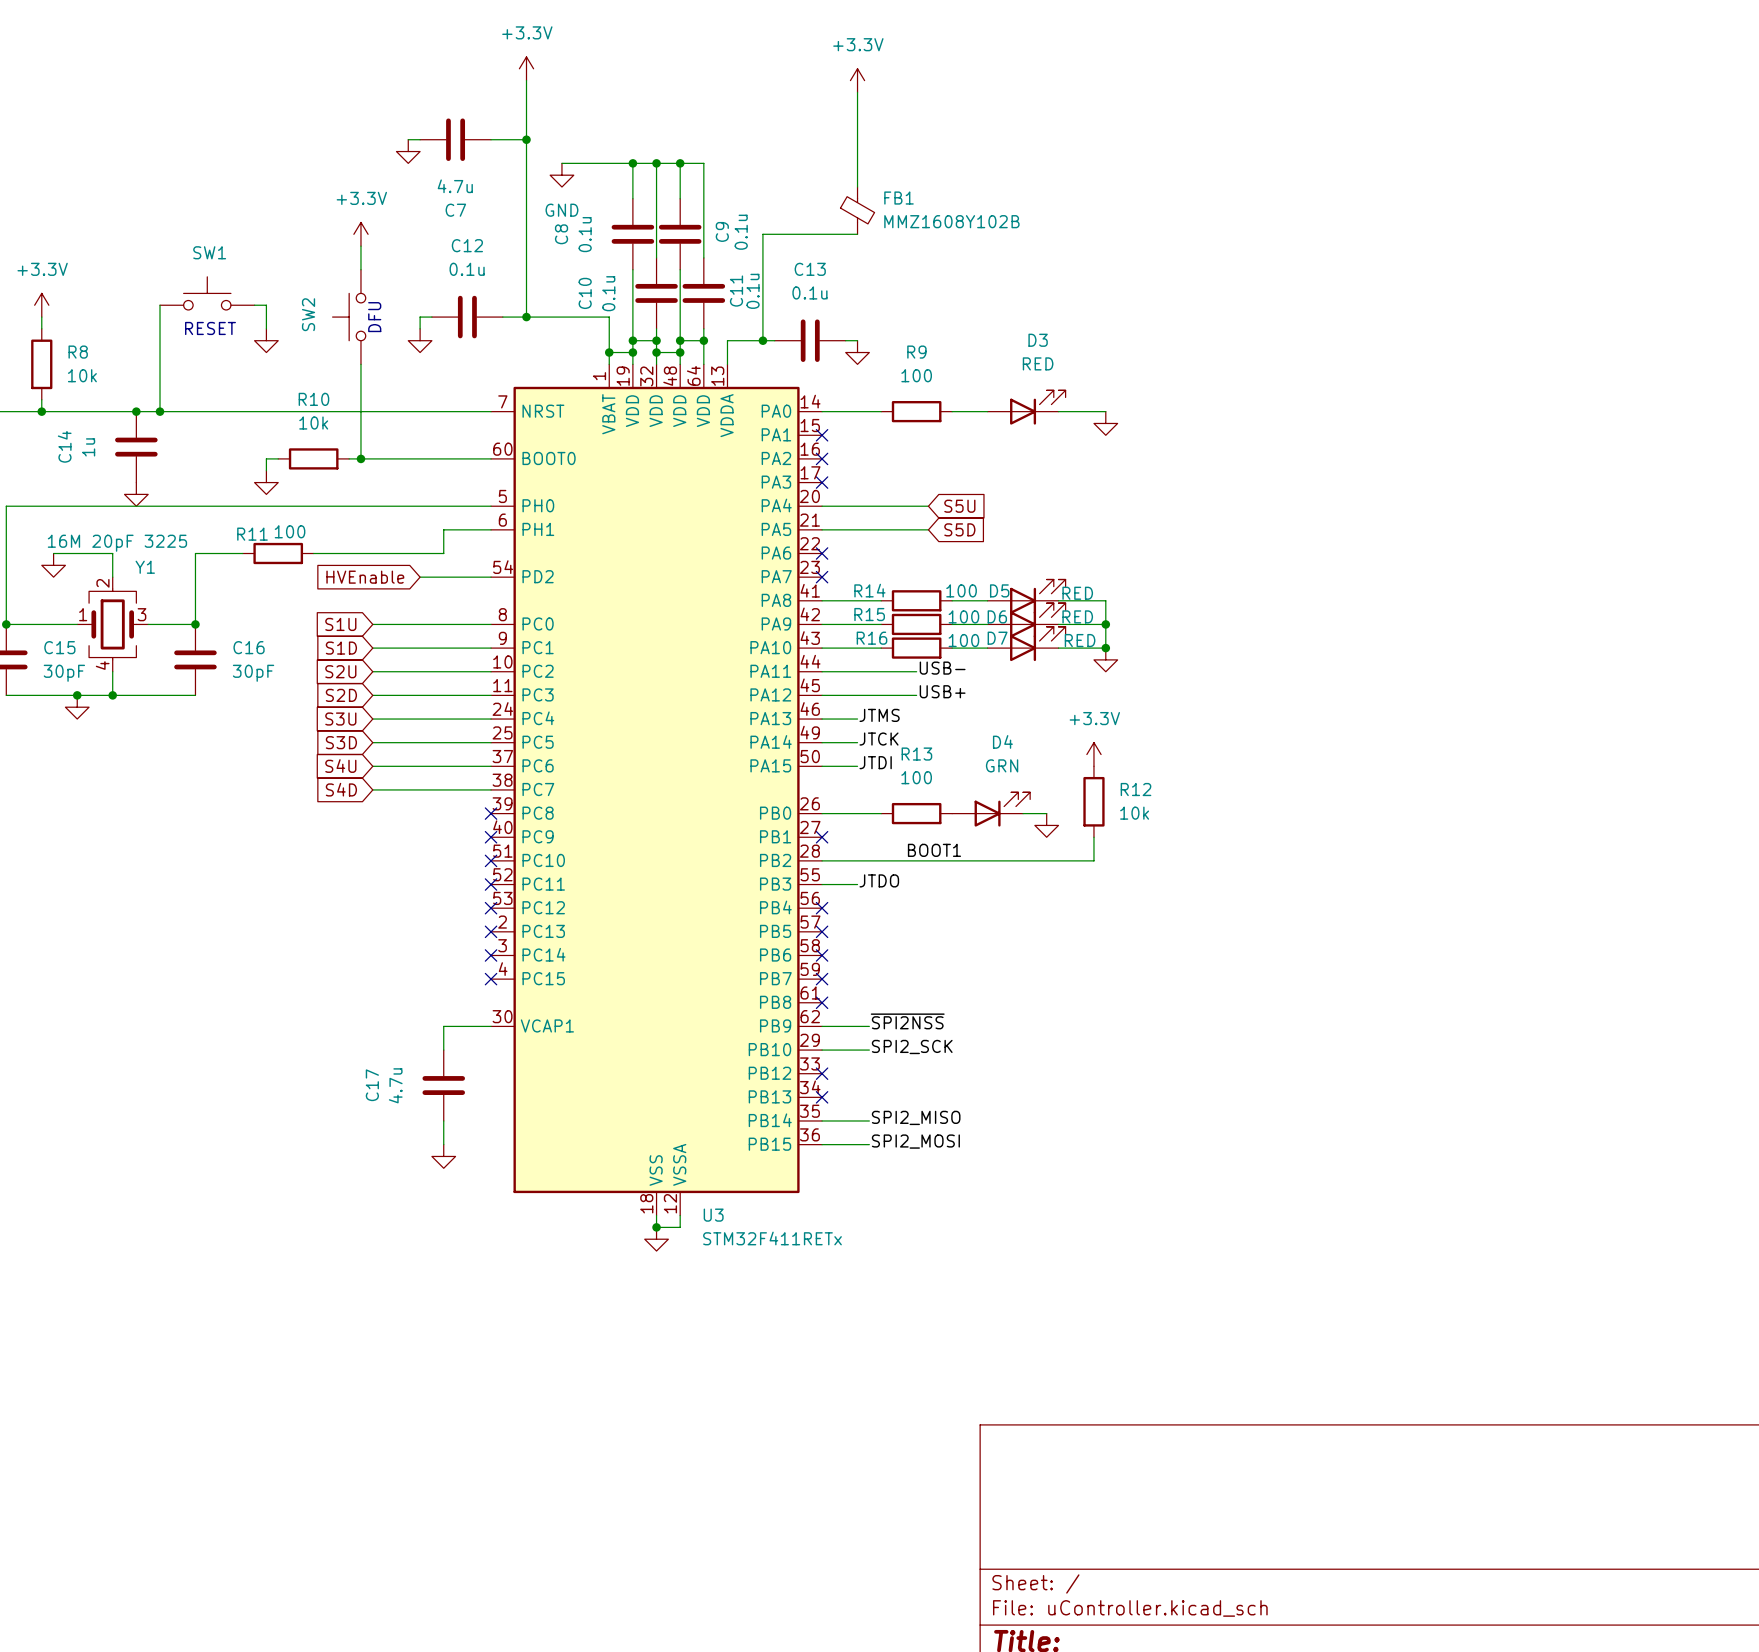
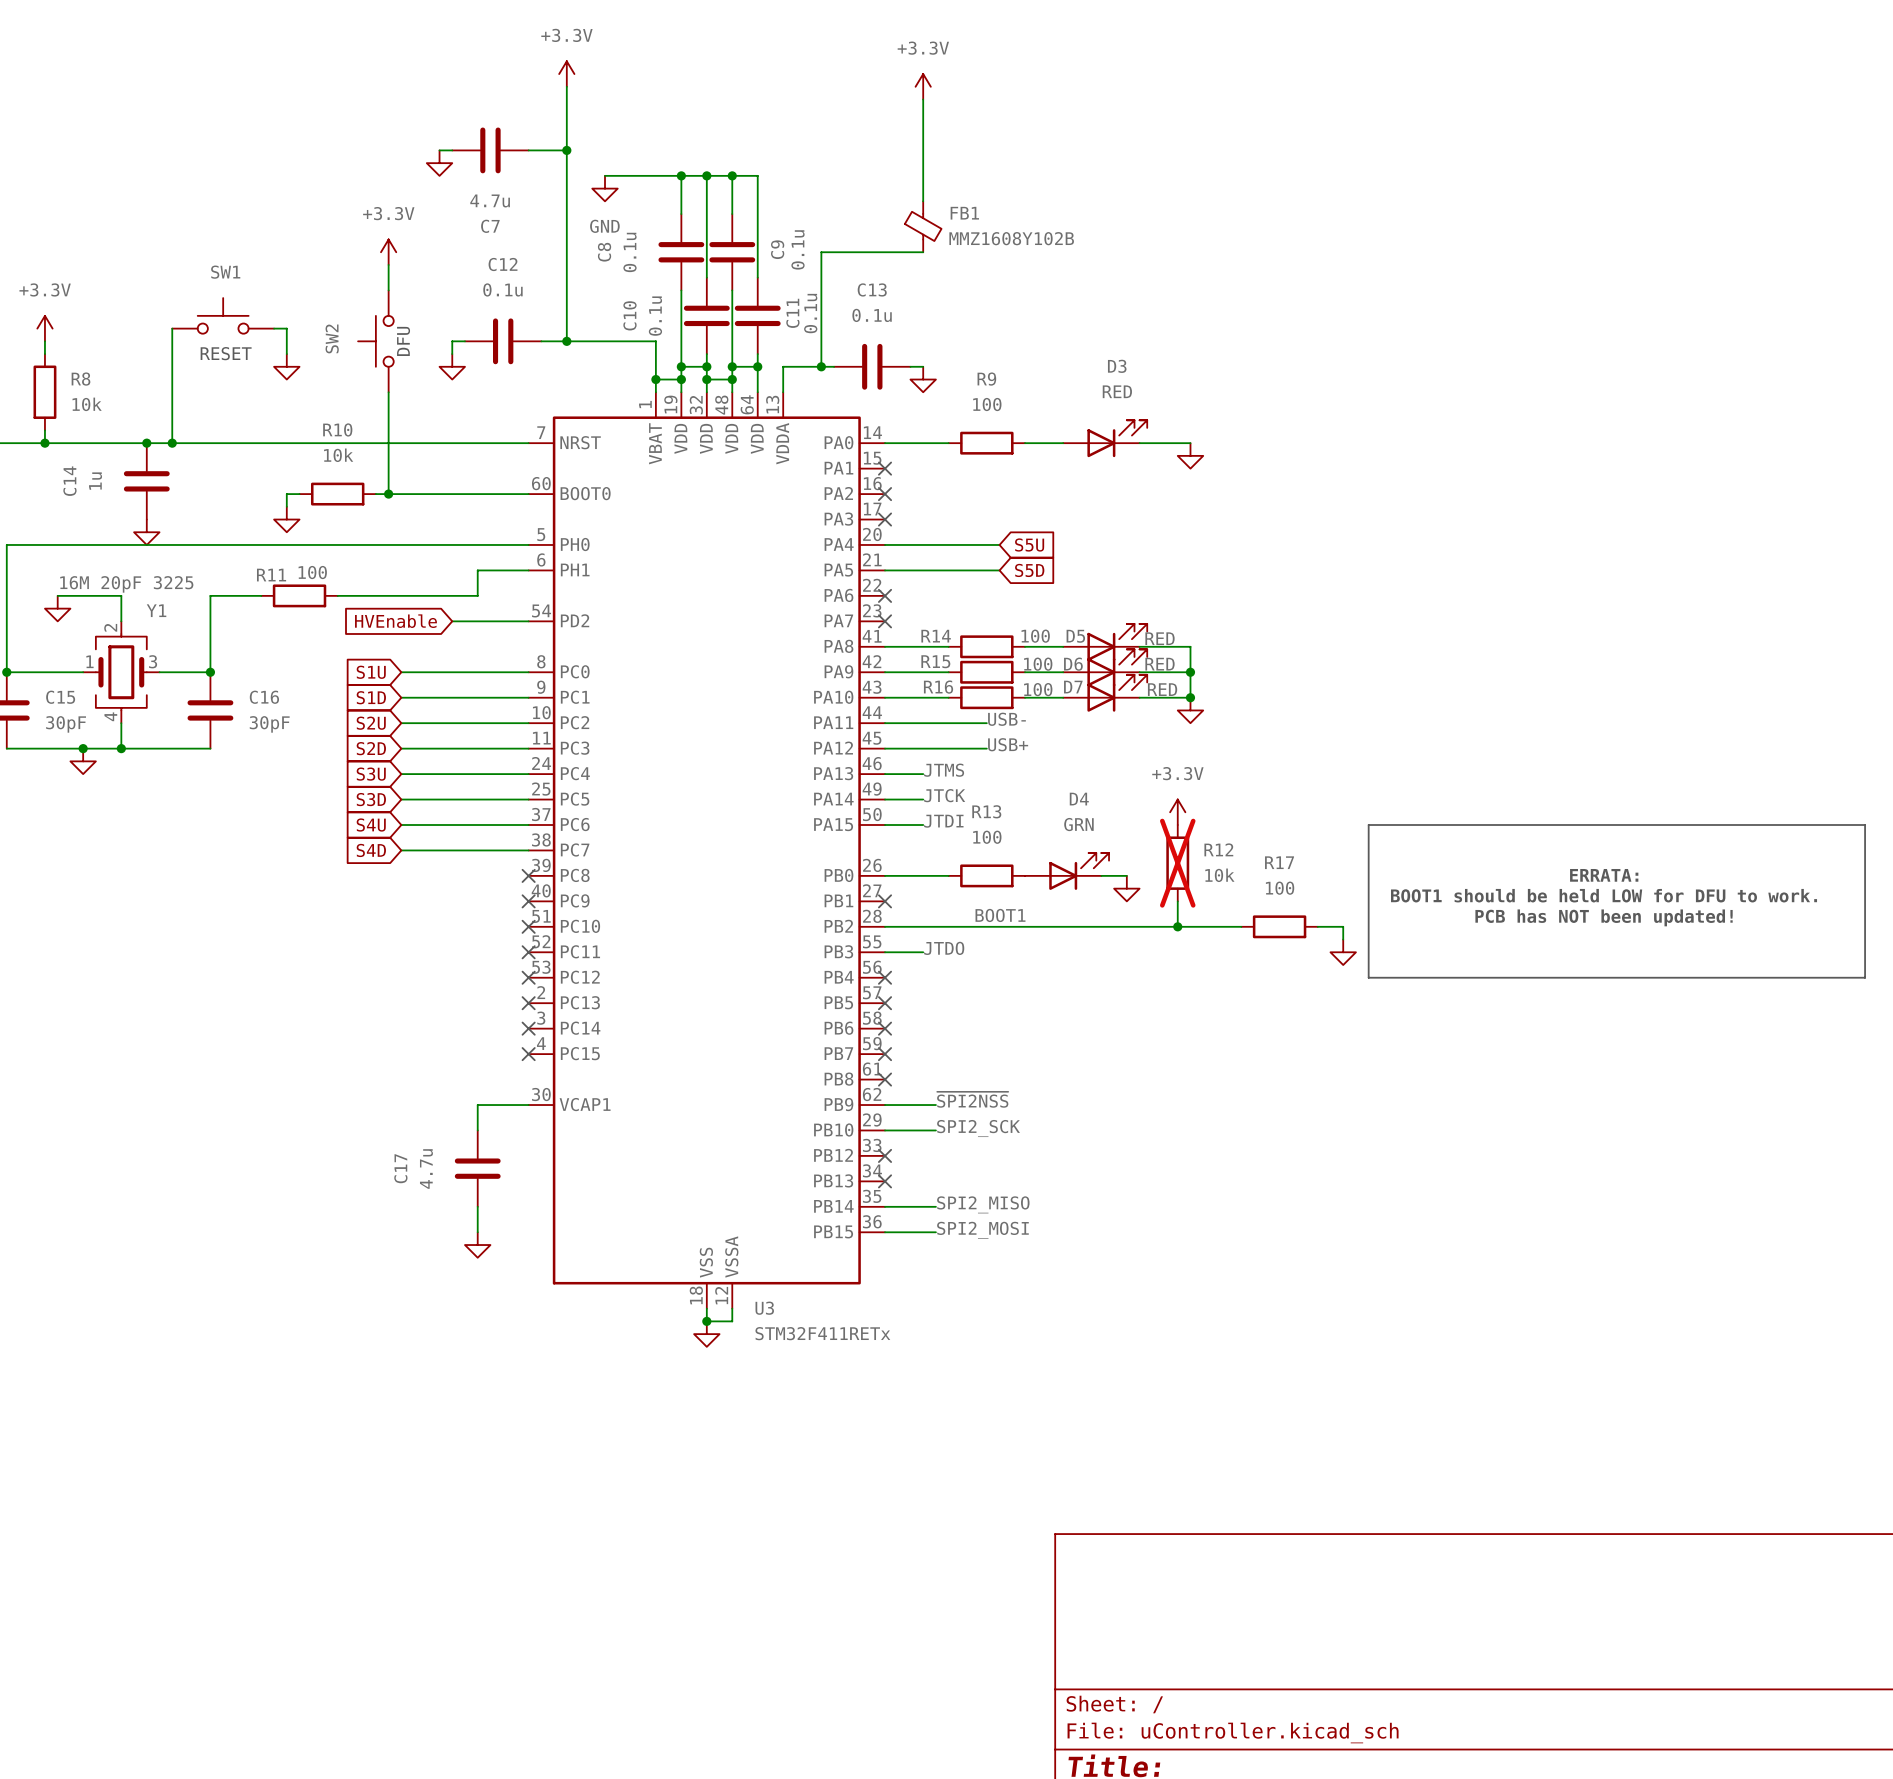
line: none -> (1368, 825) (1865, 825) (1865, 977) (1368, 977) (1368, 825)
R12 do-not-place cross: none -> (1177, 863)
text: none -> ERRATA: (1604, 875)
text: none -> BOOT1 should be held LOW for DFU to work. (1604, 895)
text: none -> PCB has NOT been updated! (1604, 917)
wire: none -> (1177, 926) (1241, 926)
junction: none -> (1177, 926)
R17: none -> 100 (1279, 926)
wire: none -> (1317, 926) (1343, 926) (1343, 939)
power symbol: none -> (1343, 952)

